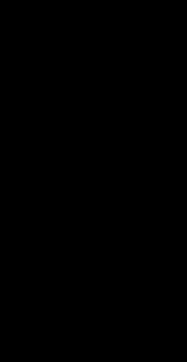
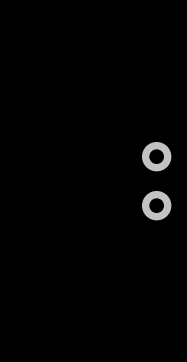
via: none -> (156, 156)
via: none -> (156, 205)

